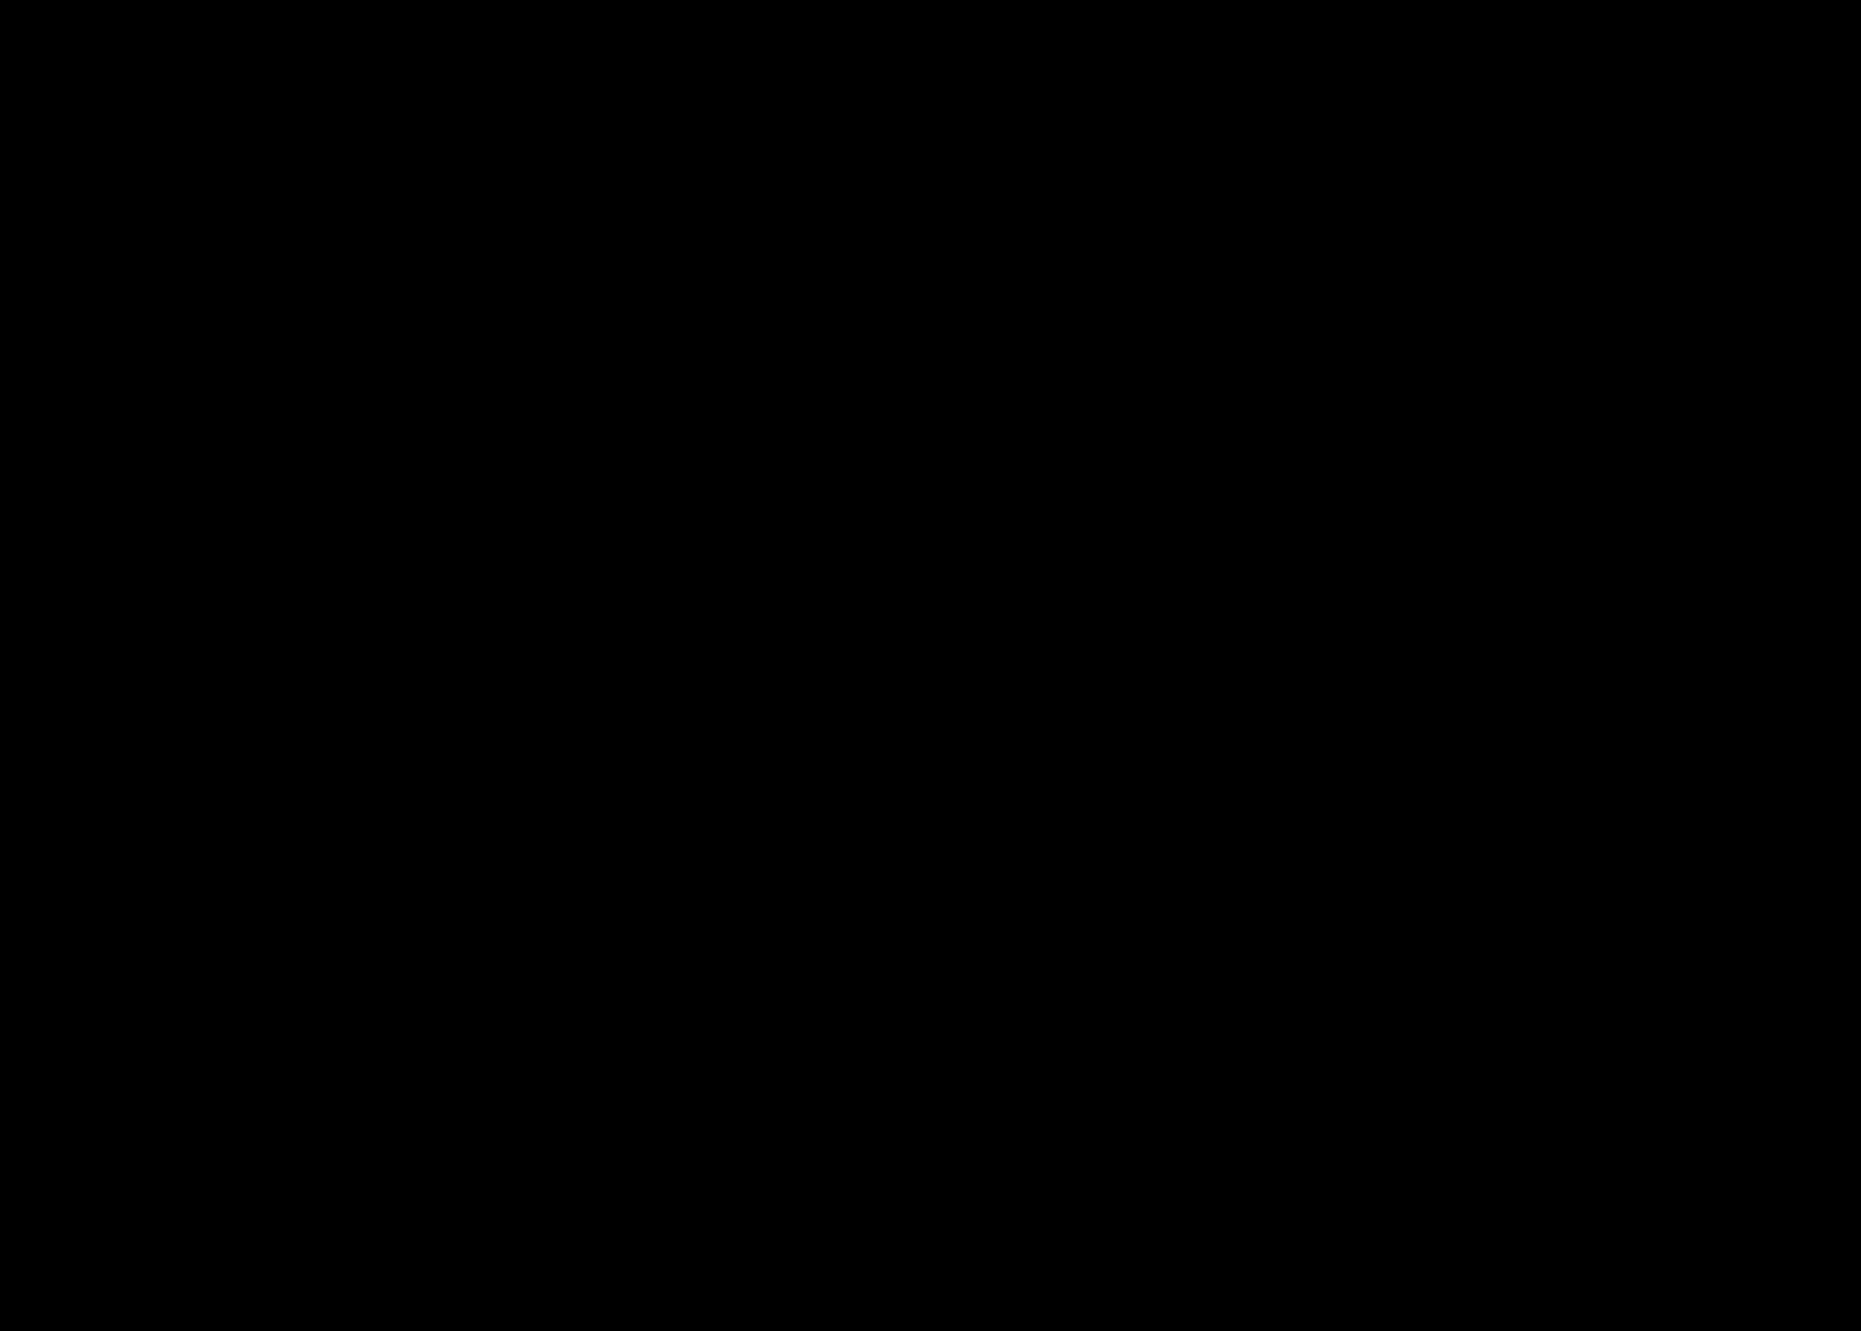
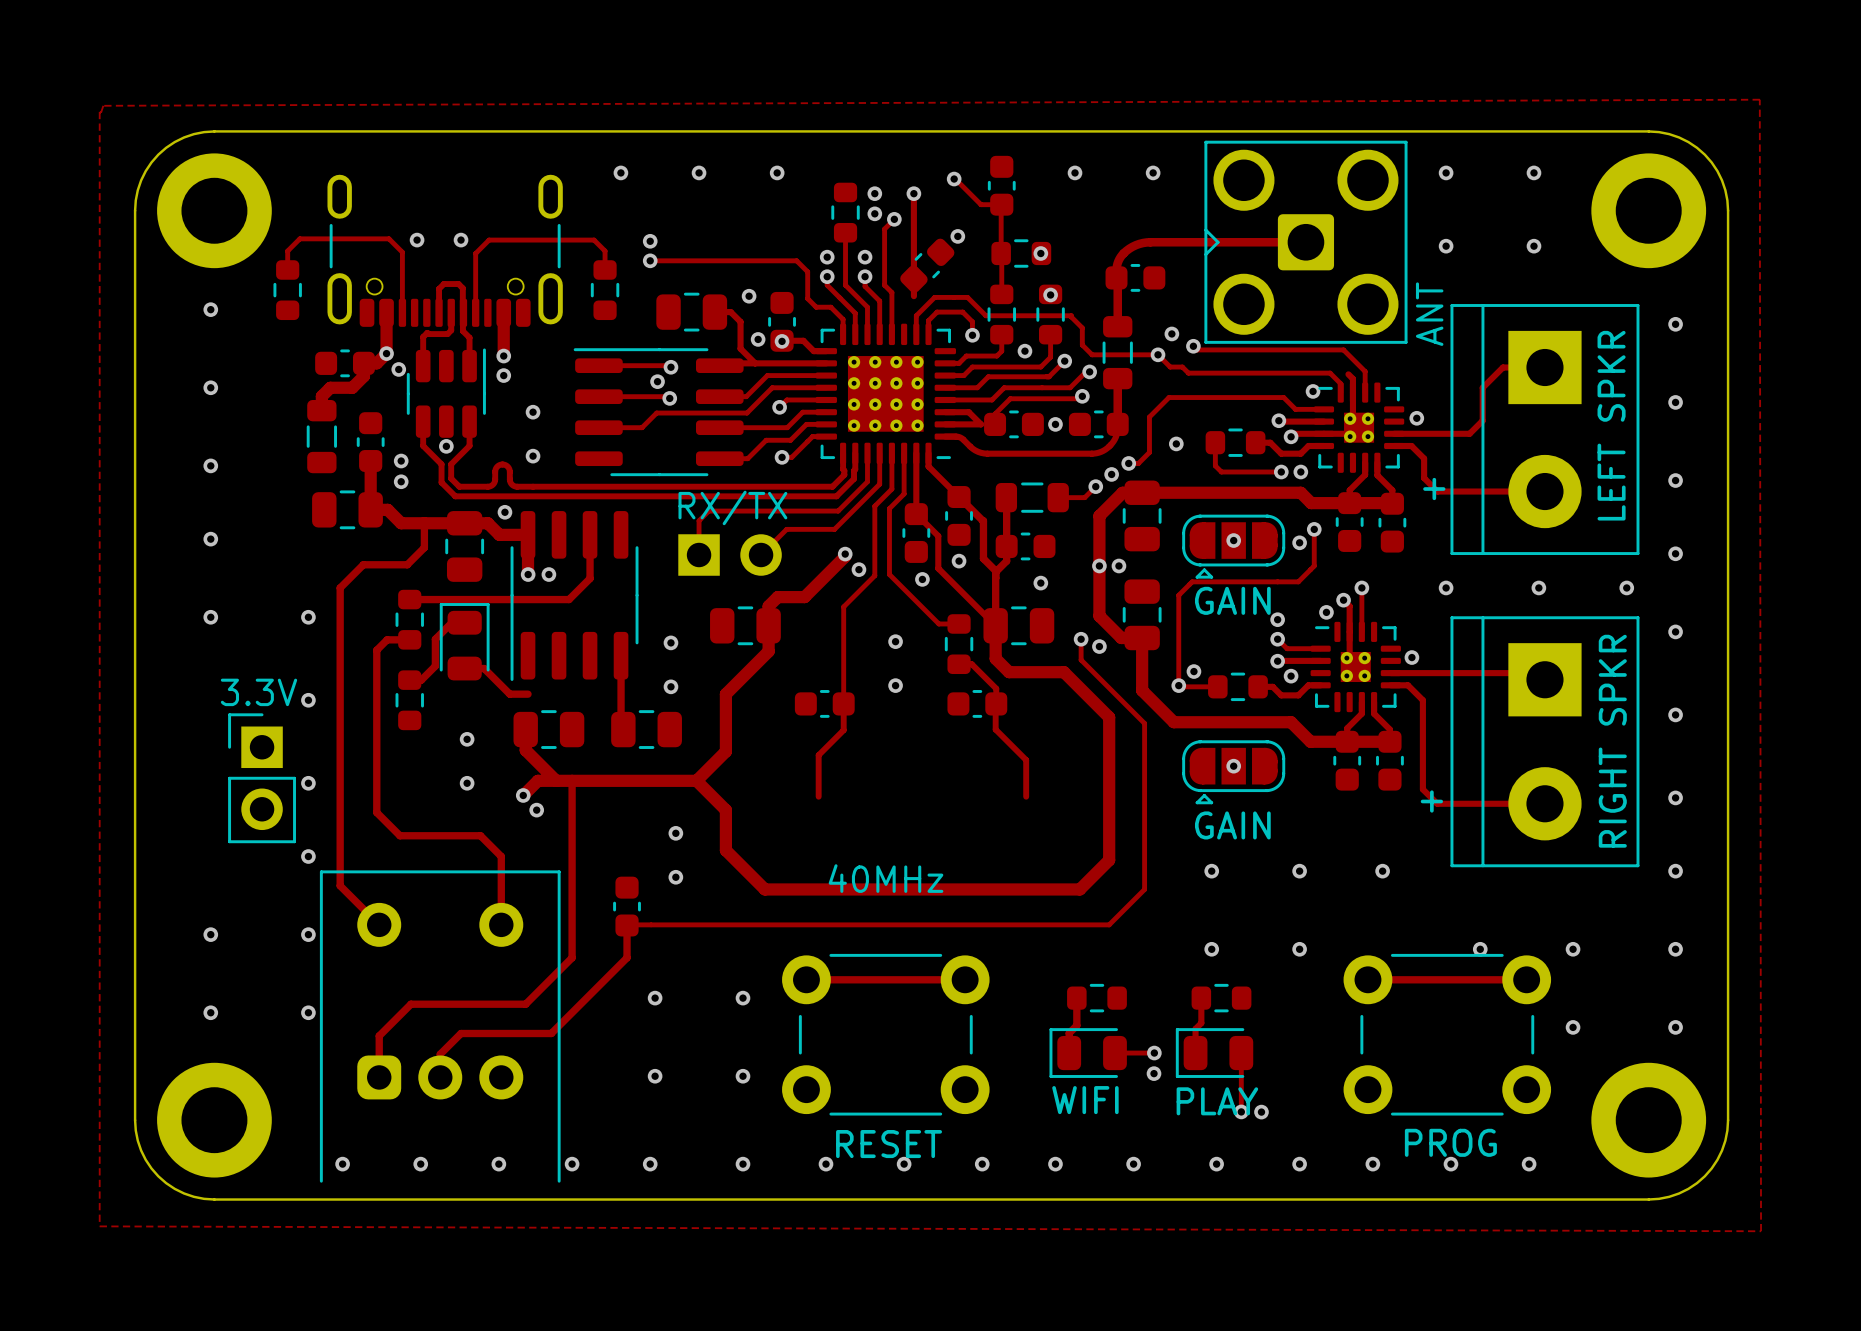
zone outline: none -> (1759, 99) (1761, 1231) (99, 1226) (99, 111) (100, 113) (103, 105) (1759, 99)
board edge: none -> (214, 131) (1648, 131) (1679, 137) (1697, 147) (1711, 162) (1722, 180) (1728, 210) (1728, 1120) (1722, 1150) (1711, 1168) (1688, 1188) (1669, 1196) (1648, 1199) (214, 1199) (193, 1196) (166, 1183) (145, 1159) (137, 1140) (135, 1120) (135, 210) (141, 180) (158, 154) (184, 137) (214, 131)
via: none -> (620, 172)
via: none -> (699, 172)
via: none -> (777, 172)
via: none -> (1075, 172)
via: none -> (1153, 172)
via: none -> (1446, 172)
via: none -> (1533, 172)
track: none -> (954, 179) (981, 204) (1001, 204) (1001, 294)
via: none -> (954, 179)
part: none -> (1001, 185)
via: none -> (874, 193)
track: none -> (913, 193) (913, 296)
via: none -> (913, 193)
part: none -> (214, 210)
part: none -> (1648, 210)
part: none -> (845, 212)
via: none -> (874, 213)
track: none -> (894, 219) (884, 229) (884, 285) (891, 292) (891, 334)
via: none -> (894, 219)
track: none -> (845, 232) (845, 285) (867, 307) (867, 334)
via: none -> (957, 236)
via: none -> (417, 240)
via: none -> (461, 240)
via: none -> (650, 241)
track: none -> (1305, 242) (1150, 242) (1135, 245) (1123, 253) (1116, 265) (1117, 326)
part: none -> (1305, 242)
via: none -> (1446, 246)
via: none -> (1533, 246)
part: none -> (445, 250)
part: none -> (1021, 253)
via: none -> (1040, 253)
via: none -> (827, 257)
via: none -> (865, 257)
track: none -> (650, 260) (796, 260) (807, 271) (807, 298) (816, 307) (830, 307) (843, 319) (843, 334)
via: none -> (650, 260)
part: none -> (927, 265)
track: none -> (287, 269) (287, 251) (299, 238) (388, 238) (402, 252) (402, 312)
track: none -> (605, 269) (605, 251) (594, 240) (489, 240) (475, 253) (475, 312)
track: none -> (827, 276) (827, 285) (855, 313) (855, 334)
via: none -> (827, 276)
track: none -> (865, 276) (865, 286) (879, 301) (879, 334)
via: none -> (865, 276)
part: none -> (1135, 277)
part: none -> (287, 290)
part: none -> (605, 290)
via: none -> (1050, 295)
via: none -> (749, 296)
via: none -> (210, 309)
track: none -> (386, 312) (386, 353) (376, 363) (363, 363) (363, 376) (352, 387) (330, 387) (321, 396) (321, 410)
track: none -> (451, 312) (451, 330) (447, 334) (427, 332) (423, 337) (423, 366)
track: none -> (462, 312) (462, 288) (458, 284) (443, 284) (439, 288) (439, 312)
track: none -> (462, 312) (462, 331) (469, 337) (469, 366)
track: none -> (503, 312) (503, 356)
part: none -> (691, 312)
track: none -> (714, 312) (730, 312) (740, 321) (740, 348) (755, 363)
part: none -> (1001, 314)
part: none -> (1050, 314)
text: none -> ANT (1429, 314)
part: none -> (782, 321)
via: none -> (1675, 324)
via: none -> (1171, 333)
track: none -> (916, 334) (916, 315) (934, 297) (967, 297) (985, 315) (1071, 315) (1082, 327) (1082, 345) (1092, 354) (1158, 354) (1170, 367) (1182, 367) (1188, 373) (1330, 373) (1340, 383) (1340, 392)
track: none -> (928, 334) (928, 320) (937, 312) (962, 312) (972, 321) (972, 335)
track: none -> (1001, 334) (1001, 351) (996, 356) (966, 356) (959, 363) (945, 363)
track: none -> (1050, 334) (1050, 357) (1040, 367) (972, 367) (963, 375) (945, 375)
via: none -> (972, 335)
via: none -> (758, 339)
track: none -> (782, 340) (803, 340) (813, 351) (826, 351)
via: none -> (782, 341)
track: none -> (1193, 346) (1197, 349) (1343, 349) (1365, 371) (1365, 392)
via: none -> (1193, 346)
via: none -> (1024, 351)
part: none -> (1117, 352)
via: none -> (386, 353)
via: none -> (1158, 354)
via: none -> (503, 356)
track: none -> (1064, 361) (1049, 376)
via: none -> (1064, 361)
part: none -> (345, 363)
track: none -> (826, 363) (722, 363) (719, 365)
track: none -> (598, 365) (669, 365) (670, 367)
via: none -> (670, 367)
track: none -> (1544, 367) (1502, 367) (1482, 387) (1482, 420) (1469, 433) (1394, 433)
via: none -> (398, 369)
track: none -> (1089, 371) (1086, 371) (1070, 387) (1004, 387) (992, 399) (945, 399)
via: none -> (1089, 371)
track: none -> (1348, 374) (1352, 378) (1352, 415) (1350, 418)
via: none -> (503, 375)
track: none -> (826, 375) (767, 375) (746, 396) (719, 396)
track: none -> (1049, 376) (988, 376) (977, 387) (945, 387)
track: none -> (1117, 378) (1116, 434) (1109, 446) (1098, 452) (984, 453) (975, 450) (959, 437) (945, 436)
via: none -> (657, 381)
via: none -> (210, 387)
track: none -> (826, 387) (772, 387) (747, 413) (656, 413) (642, 427) (598, 427)
via: none -> (1313, 391)
part: none -> (446, 393)
part: none -> (885, 393)
track: none -> (598, 396) (668, 396) (669, 398)
track: none -> (1082, 396) (1079, 398) (1010, 398) (995, 414) (995, 424)
via: none -> (1082, 396)
via: none -> (669, 398)
track: none -> (826, 399) (786, 399) (779, 407)
via: none -> (1675, 402)
via: none -> (779, 407)
track: none -> (1323, 409) (1295, 409) (1283, 397) (1169, 397) (1149, 417) (1149, 452) (1138, 463) (1128, 463)
via: none -> (533, 412)
part: none -> (658, 412)
track: none -> (826, 412) (802, 412) (787, 427) (719, 427)
track: none -> (945, 412) (968, 412) (981, 424) (945, 424)
via: none -> (1416, 418)
track: none -> (1278, 420) (1323, 421)
via: none -> (1278, 420)
track: none -> (423, 421) (423, 445) (441, 464) (441, 482) (455, 496) (836, 496) (854, 478) (855, 453)
track: none -> (469, 421) (469, 445) (451, 464) (451, 478) (459, 486) (491, 485) (494, 481) (496, 468) (502, 464) (508, 468) (510, 482) (516, 486) (832, 486) (844, 474) (843, 453)
track: none -> (826, 424) (806, 424) (790, 440) (766, 440) (747, 458) (719, 458)
part: none -> (1013, 424)
via: none -> (1055, 424)
part: none -> (1098, 424)
text: none -> LEFT SPKR (1611, 425)
part: none -> (1359, 427)
part: none -> (1544, 429)
part: none -> (321, 436)
track: none -> (826, 436) (812, 436) (791, 457) (782, 457)
via: none -> (1291, 436)
track: none -> (1350, 436) (1347, 433) (1294, 433) (1291, 436)
part: none -> (370, 442)
track: none -> (1215, 442) (1215, 465) (1221, 472) (1281, 472)
part: none -> (1235, 442)
via: none -> (1176, 443)
via: none -> (446, 446)
track: none -> (1323, 446) (1308, 446) (1300, 453) (1281, 453) (1270, 442) (1255, 442) (1261, 448)
track: none -> (1394, 446) (1411, 446) (1424, 458) (1424, 478) (1437, 491) (1544, 491)
track: none -> (867, 453) (867, 481) (838, 511) (708, 511) (699, 520) (699, 555)
track: none -> (879, 453) (879, 484) (834, 529) (786, 529) (761, 555)
track: none -> (891, 453) (891, 489) (874, 506) (874, 575) (843, 606) (843, 703)
track: none -> (904, 453) (904, 493) (889, 508) (889, 574) (938, 623) (959, 623)
track: none -> (916, 453) (916, 514) (938, 536) (938, 568) (995, 625)
track: none -> (928, 453) (928, 466) (983, 520) (983, 558) (995, 570) (995, 625)
via: none -> (533, 456)
via: none -> (782, 457)
track: none -> (370, 461) (370, 509) (387, 509) (401, 523) (487, 523) (499, 534) (528, 534) (528, 574)
via: none -> (401, 461)
track: none -> (1365, 462) (1365, 474) (1349, 490) (1349, 503)
track: none -> (1377, 462) (1377, 475) (1392, 490) (1392, 503) (1311, 503) (1300, 492) (1122, 492) (1099, 515) (1099, 616) (1121, 638) (1142, 638) (1142, 690) (1173, 722) (1291, 722) (1310, 741) (1389, 741) (1389, 729) (1374, 713) (1374, 702)
via: none -> (1128, 463)
via: none -> (210, 465)
via: none -> (1281, 472)
via: none -> (1300, 472)
via: none -> (1111, 474)
via: none -> (1675, 480)
via: none -> (401, 481)
track: none -> (1095, 486) (1084, 497) (1058, 497)
via: none -> (1095, 486)
text: none -> + (1434, 489)
track: none -> (1006, 497) (1006, 561) (995, 572)
part: none -> (1032, 497)
text: none -> RX/TX (732, 507)
part: none -> (347, 509)
via: none -> (504, 512)
part: none -> (959, 515)
part: none -> (1142, 515)
part: none -> (1349, 522)
part: none -> (1392, 522)
track: none -> (424, 523) (424, 547) (407, 564) (363, 564) (340, 587) (340, 885) (379, 924)
track: none -> (1314, 529) (1314, 565) (1298, 581) (1192, 581) (1178, 595) (1178, 685) (1217, 686)
via: none -> (1314, 529)
part: none -> (916, 533)
track: none -> (590, 534) (590, 578) (569, 599) (409, 599)
via: none -> (210, 539)
via: none -> (1233, 540)
via: none -> (1299, 542)
part: none -> (464, 546)
part: none -> (1025, 546)
part: none -> (1233, 546)
via: none -> (1675, 553)
track: none -> (845, 554) (845, 556) (804, 597) (777, 597) (768, 606) (768, 651) (725, 694) (725, 751) (696, 780)
via: none -> (845, 554)
part: none -> (730, 555)
via: none -> (959, 561)
via: none -> (1099, 565)
via: none -> (1118, 565)
via: none -> (858, 569)
via: none -> (528, 574)
via: none -> (548, 574)
via: none -> (922, 579)
via: none -> (1040, 583)
track: none -> (1361, 587) (1361, 631)
via: none -> (1361, 587)
via: none -> (1446, 587)
via: none -> (1538, 587)
via: none -> (1626, 587)
part: none -> (574, 596)
text: none -> GAIN (1232, 600)
track: none -> (1343, 600) (1349, 606) (1349, 655) (1346, 658)
via: none -> (1343, 600)
via: none -> (1326, 612)
part: none -> (1142, 614)
via: none -> (210, 617)
via: none -> (308, 617)
part: none -> (409, 619)
via: none -> (1277, 619)
track: none -> (464, 622) (451, 622) (435, 639) (435, 666) (421, 680) (409, 680)
part: none -> (745, 625)
track: none -> (995, 625) (995, 658) (1009, 672) (1064, 672) (1109, 717) (1109, 860) (1079, 889) (764, 889) (725, 850) (725, 810) (696, 780)
part: none -> (1018, 625)
via: none -> (1675, 631)
track: none -> (409, 639) (387, 639) (376, 650) (376, 812) (399, 835) (480, 835) (501, 856) (501, 924)
track: none -> (1081, 639) (1081, 659) (1144, 723) (1144, 889) (1109, 924) (651, 924)
via: none -> (1081, 639)
track: none -> (1277, 639) (1287, 648) (1320, 648)
via: none -> (1277, 639)
part: none -> (464, 641)
via: none -> (895, 641)
via: none -> (670, 642)
part: none -> (959, 644)
via: none -> (1099, 646)
track: none -> (621, 655) (621, 727) (623, 729)
via: none -> (1411, 657)
track: none -> (1277, 660) (1320, 660)
via: none -> (1277, 661)
track: none -> (959, 664) (971, 664) (996, 688) (996, 703)
part: none -> (1355, 667)
track: none -> (464, 668) (484, 668) (509, 694) (528, 694)
via: none -> (1193, 671)
track: none -> (1390, 673) (1538, 673) (1544, 679)
via: none -> (1291, 676)
via: none -> (895, 685)
via: none -> (1178, 685)
track: none -> (1320, 685) (1308, 685) (1298, 695) (1281, 695) (1272, 686) (1258, 686)
track: none -> (1390, 685) (1407, 685) (1422, 700) (1422, 789) (1437, 803) (1544, 803)
via: none -> (670, 686)
part: none -> (1237, 686)
text: none -> 3.3V (258, 692)
via: none -> (308, 700)
part: none -> (409, 700)
track: none -> (1361, 702) (1361, 713) (1347, 728) (1347, 741)
part: none -> (824, 703)
part: none -> (977, 703)
track: none -> (843, 705) (843, 730) (818, 755) (818, 796)
track: none -> (995, 705) (995, 729) (1026, 760) (1026, 796)
via: none -> (1675, 714)
track: none -> (519, 723) (525, 729) (525, 750) (556, 780)
part: none -> (548, 729)
part: none -> (646, 729)
via: none -> (467, 739)
part: none -> (1544, 741)
text: none -> RIGHT SPKR (1612, 741)
part: none -> (1347, 760)
part: none -> (1389, 760)
via: none -> (1233, 766)
part: none -> (1233, 772)
part: none -> (262, 778)
track: none -> (572, 780) (572, 957) (525, 1004) (410, 1004) (379, 1035) (379, 1077)
track: none -> (696, 780) (537, 780) (523, 795)
via: none -> (308, 783)
via: none -> (467, 783)
via: none -> (523, 795)
via: none -> (1675, 797)
text: none -> + (1431, 801)
via: none -> (536, 810)
text: none -> GAIN (1232, 825)
via: none -> (675, 833)
via: none -> (308, 856)
via: none -> (1211, 871)
via: none -> (1299, 871)
via: none -> (1382, 871)
via: none -> (1675, 871)
via: none -> (675, 877)
text: none -> 40MHz (886, 878)
part: none -> (627, 906)
track: none -> (627, 924) (650, 924)
track: none -> (627, 925) (627, 957) (551, 1033) (461, 1033) (440, 1054) (440, 1077)
via: none -> (210, 934)
via: none -> (308, 934)
via: none -> (1211, 949)
via: none -> (1299, 949)
via: none -> (1480, 949)
via: none -> (1573, 949)
via: none -> (1675, 949)
track: none -> (806, 979) (965, 979)
track: none -> (1367, 979) (1526, 979)
via: none -> (655, 998)
via: none -> (742, 998)
track: none -> (1076, 998) (1076, 1025) (1069, 1033) (1069, 1053)
part: none -> (1096, 998)
track: none -> (1201, 998) (1201, 1023) (1195, 1028) (1195, 1053)
part: none -> (1221, 998)
via: none -> (210, 1012)
via: none -> (308, 1012)
part: none -> (440, 1026)
via: none -> (1573, 1027)
via: none -> (1675, 1027)
part: none -> (885, 1034)
part: none -> (1447, 1034)
part: none -> (1088, 1053)
track: none -> (1114, 1053) (1154, 1053)
via: none -> (1154, 1053)
part: none -> (1214, 1053)
track: none -> (1241, 1053) (1241, 1111)
via: none -> (1154, 1073)
via: none -> (655, 1076)
via: none -> (742, 1076)
text: none -> WIFI (1085, 1100)
text: none -> PLAY (1217, 1101)
via: none -> (1241, 1111)
via: none -> (1261, 1112)
part: none -> (214, 1120)
part: none -> (1648, 1120)
text: none -> PROG (1450, 1142)
text: none -> RESET (889, 1144)
via: none -> (342, 1164)
via: none -> (420, 1164)
via: none -> (498, 1164)
via: none -> (572, 1164)
via: none -> (650, 1164)
via: none -> (742, 1164)
via: none -> (825, 1164)
via: none -> (904, 1164)
via: none -> (982, 1164)
via: none -> (1055, 1164)
via: none -> (1133, 1164)
via: none -> (1216, 1164)
via: none -> (1299, 1164)
via: none -> (1372, 1164)
via: none -> (1450, 1164)
via: none -> (1529, 1164)

